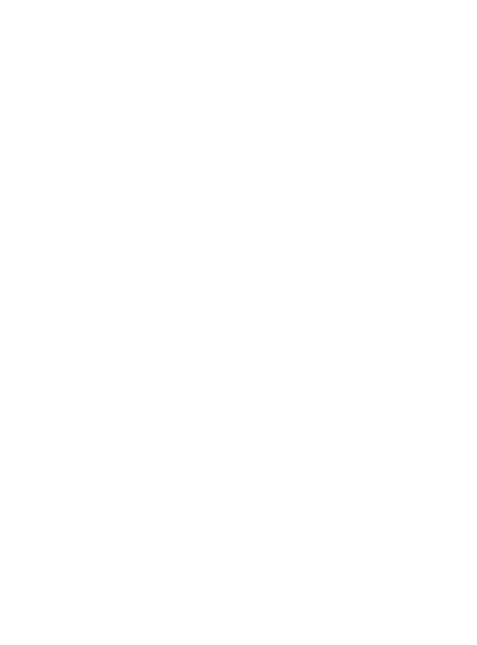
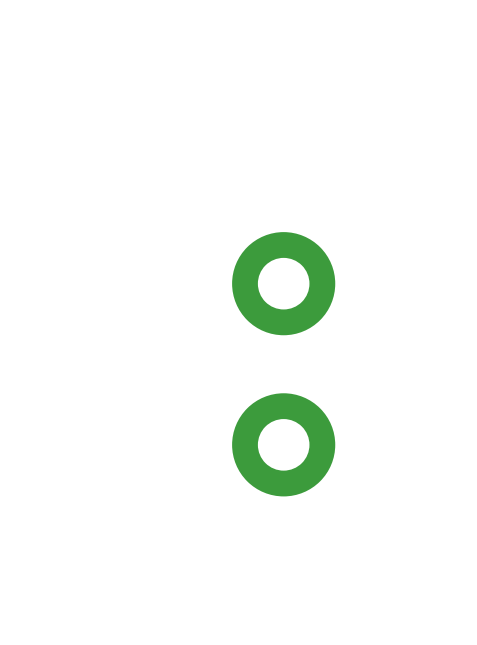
part: none -> (283, 364)

